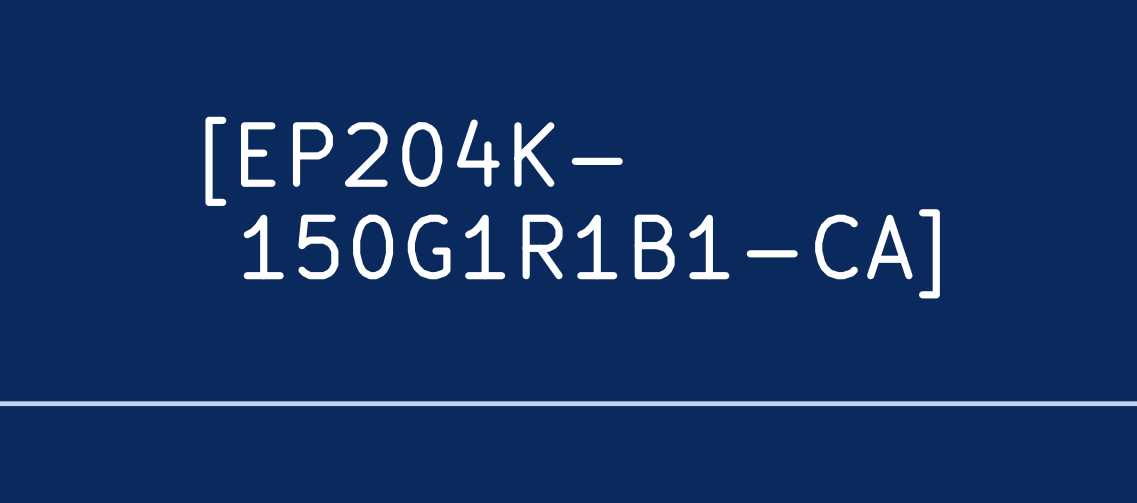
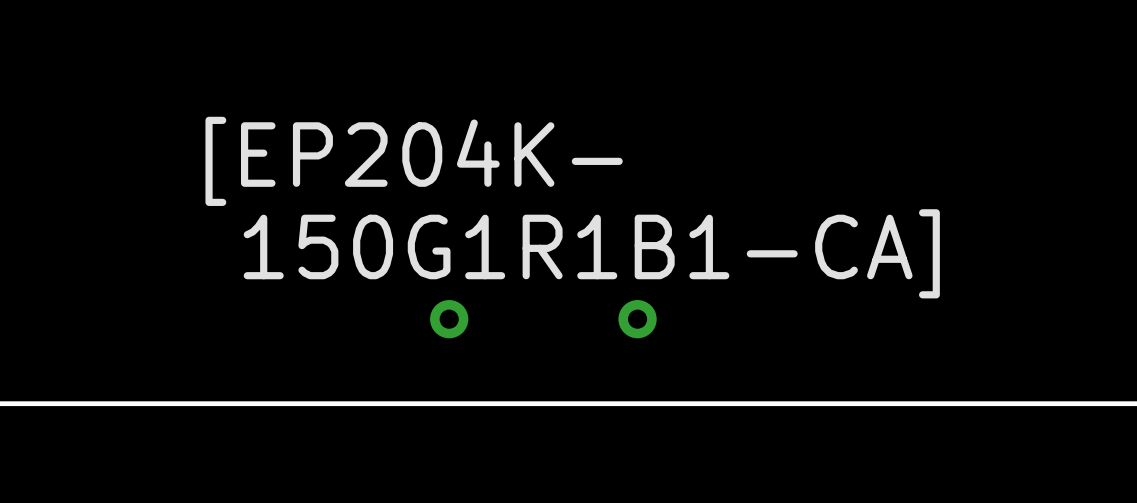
via: none -> (449, 319)
via: none -> (637, 319)

